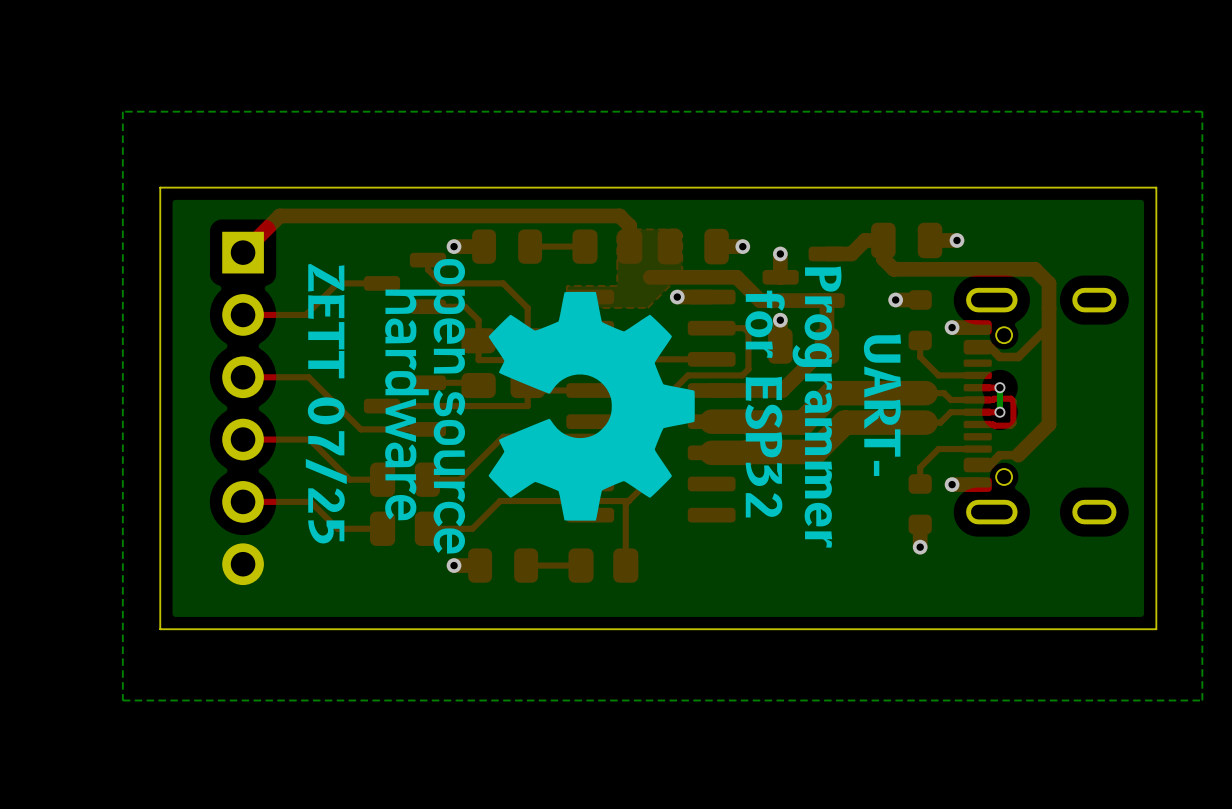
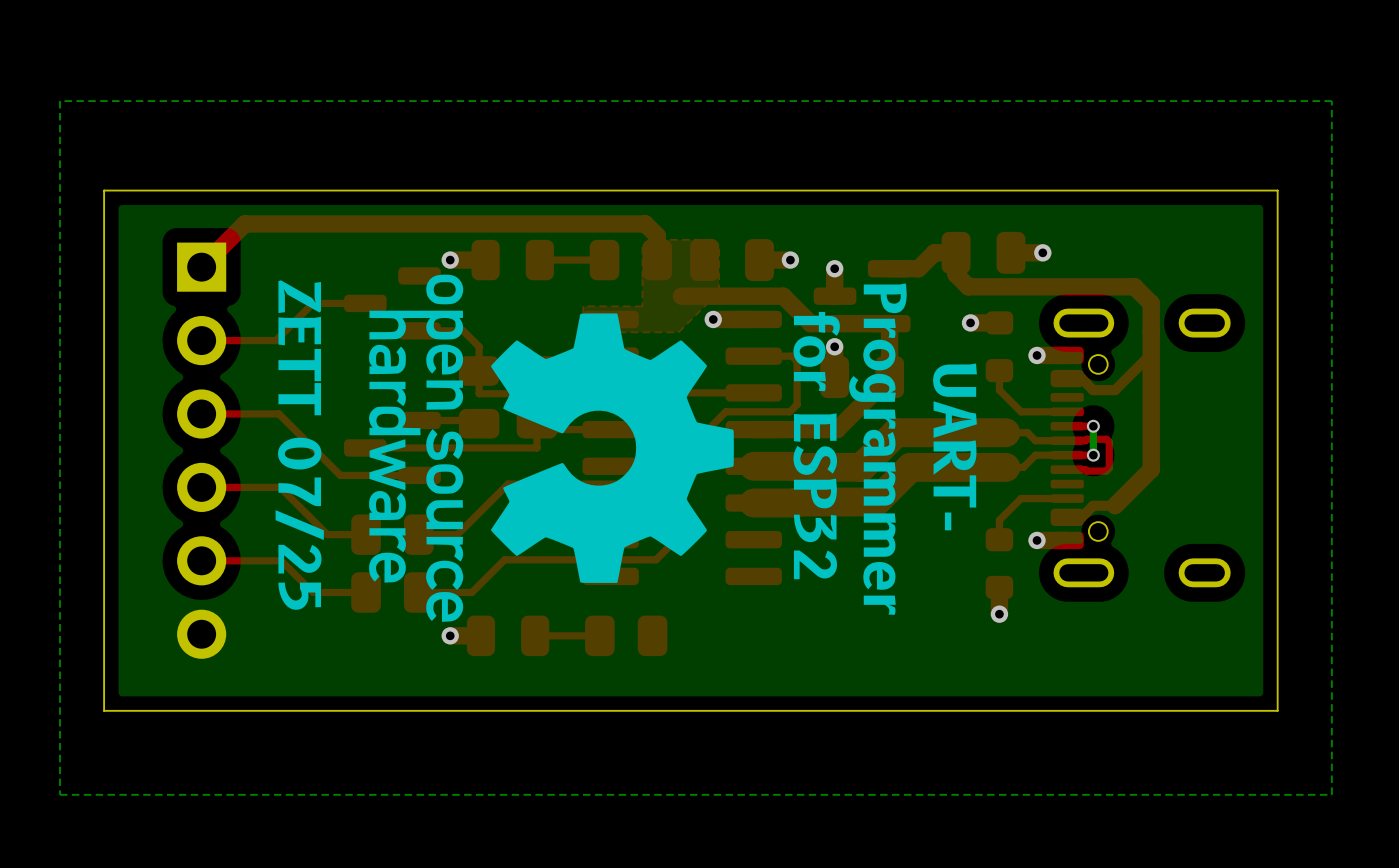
top track: (427, 260) (427, 269) (441, 283) (503, 283) (527, 307) (527, 340) -> none
top track: (628, 501) (625, 503) (625, 565) -> none

